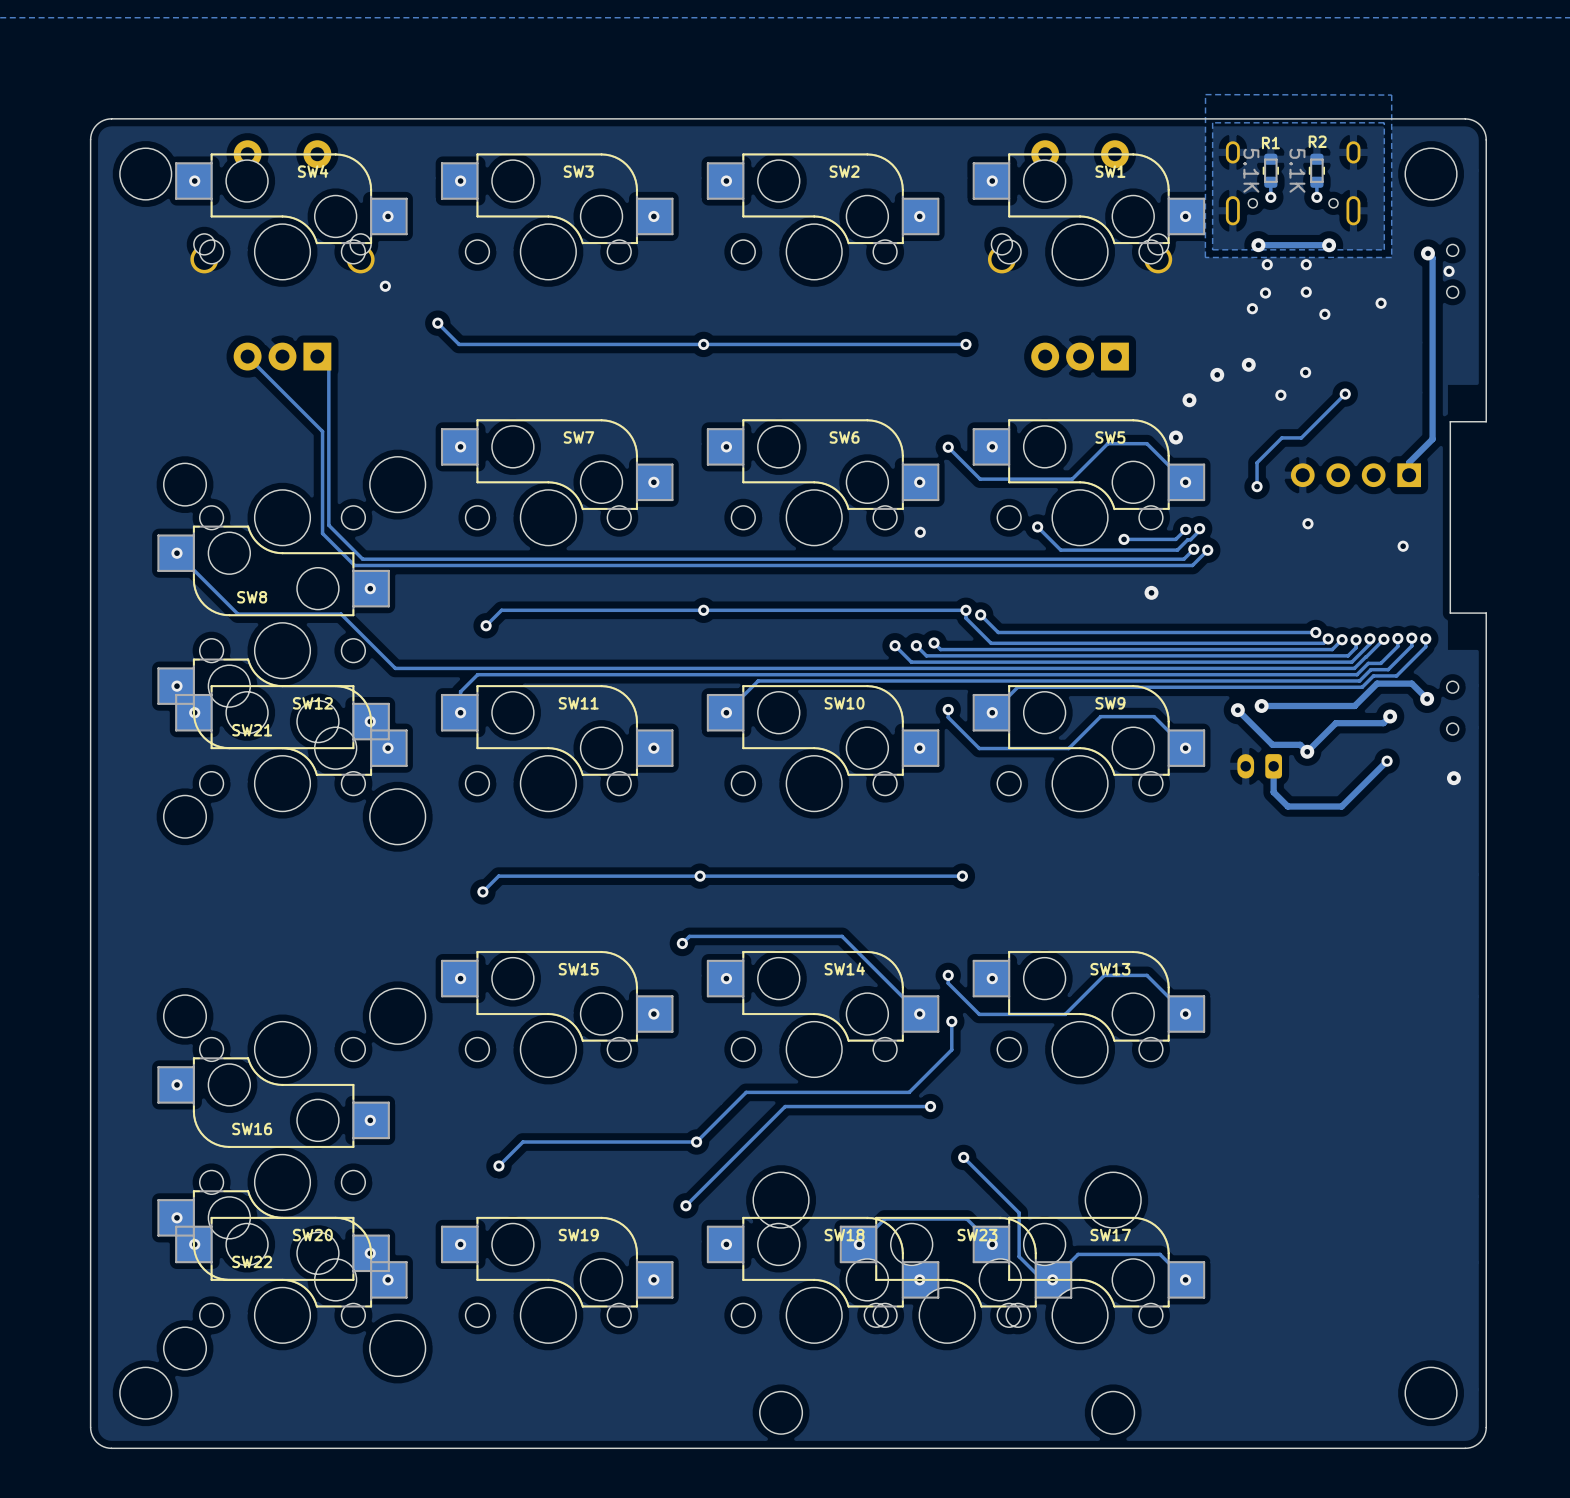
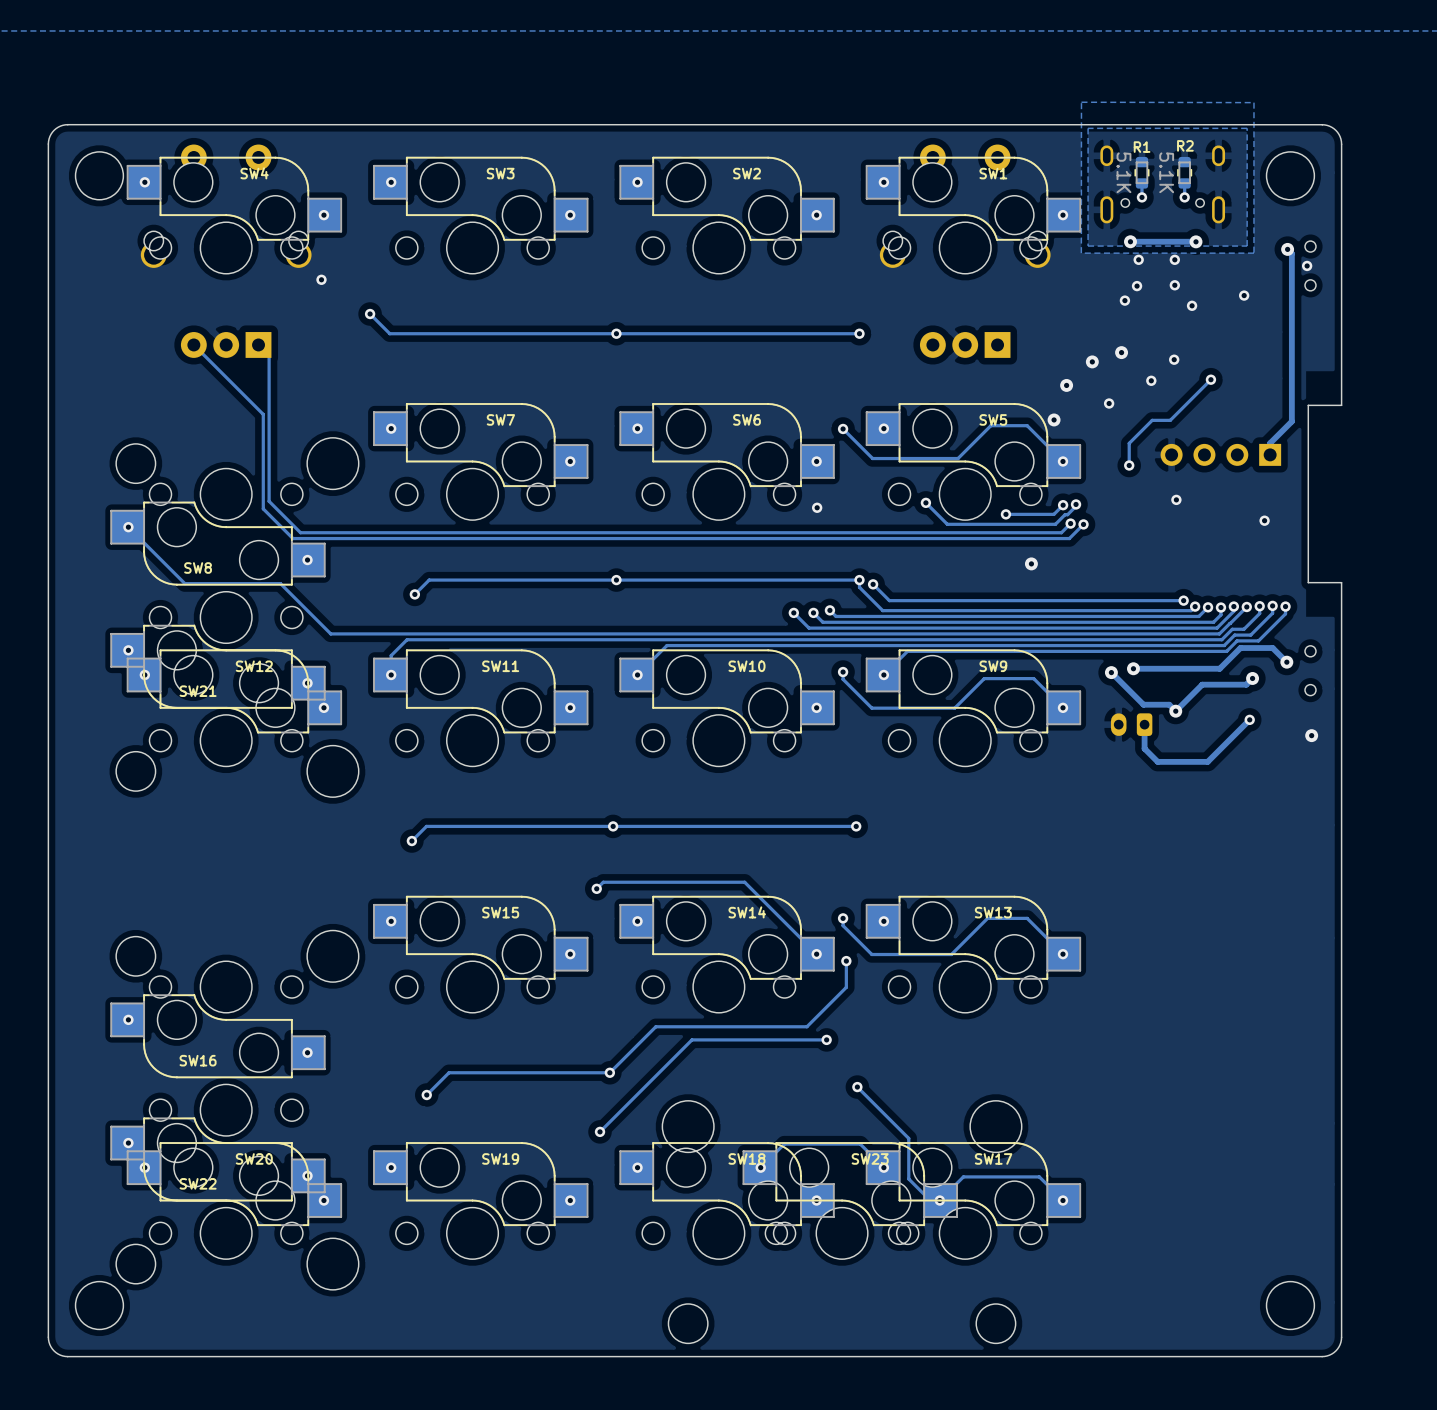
via: none -> (1109, 403)

